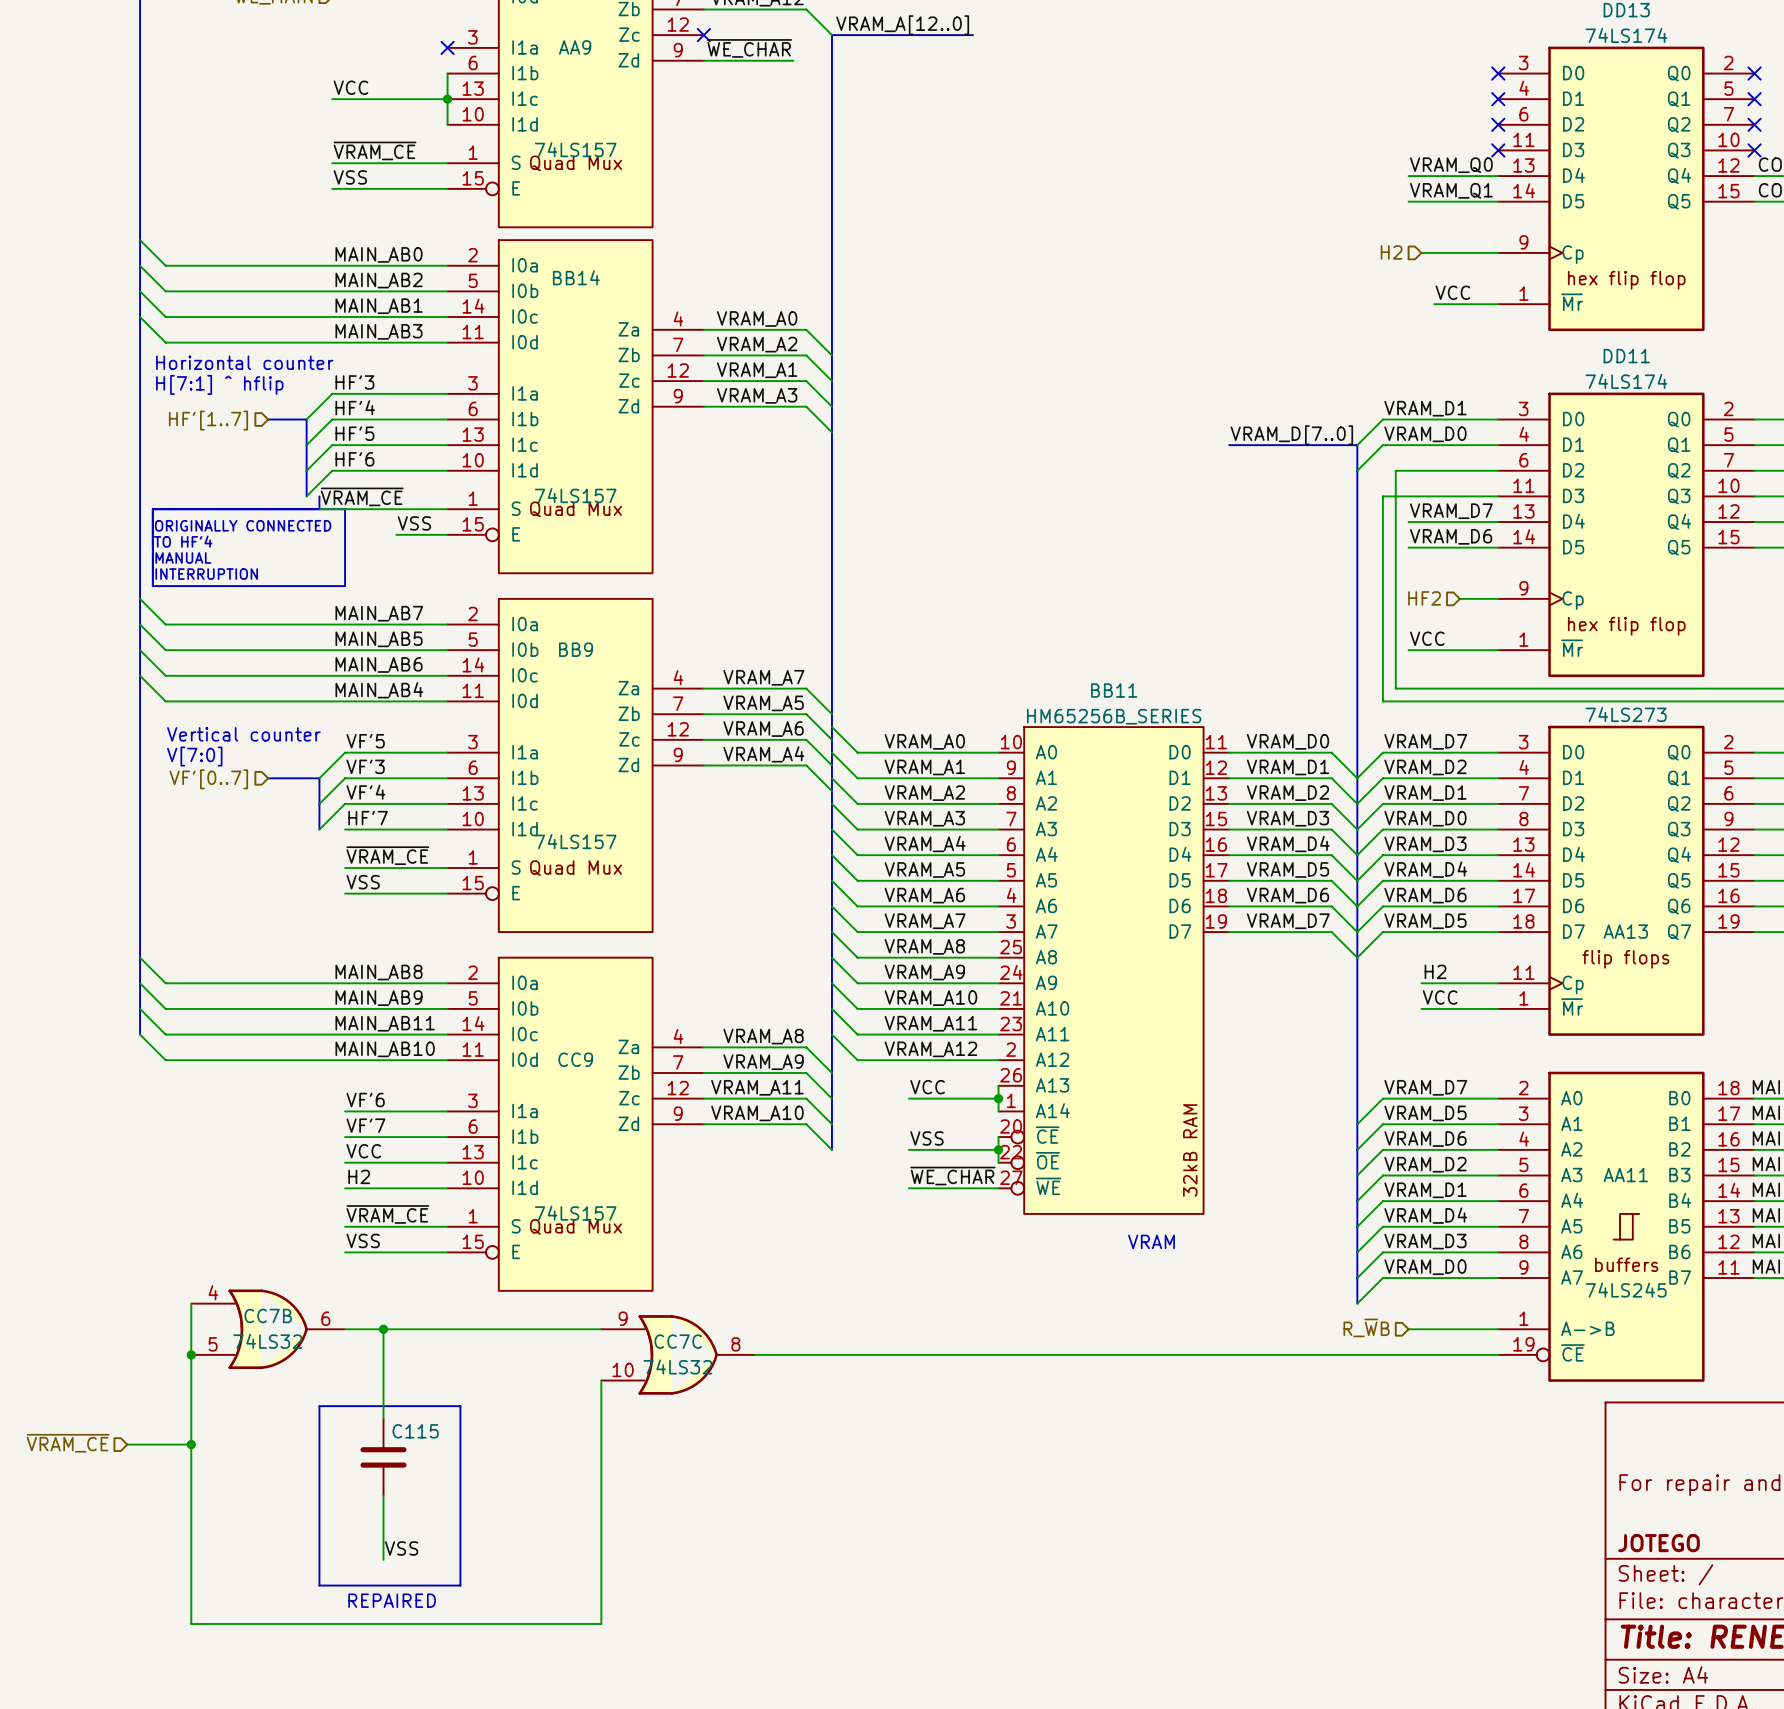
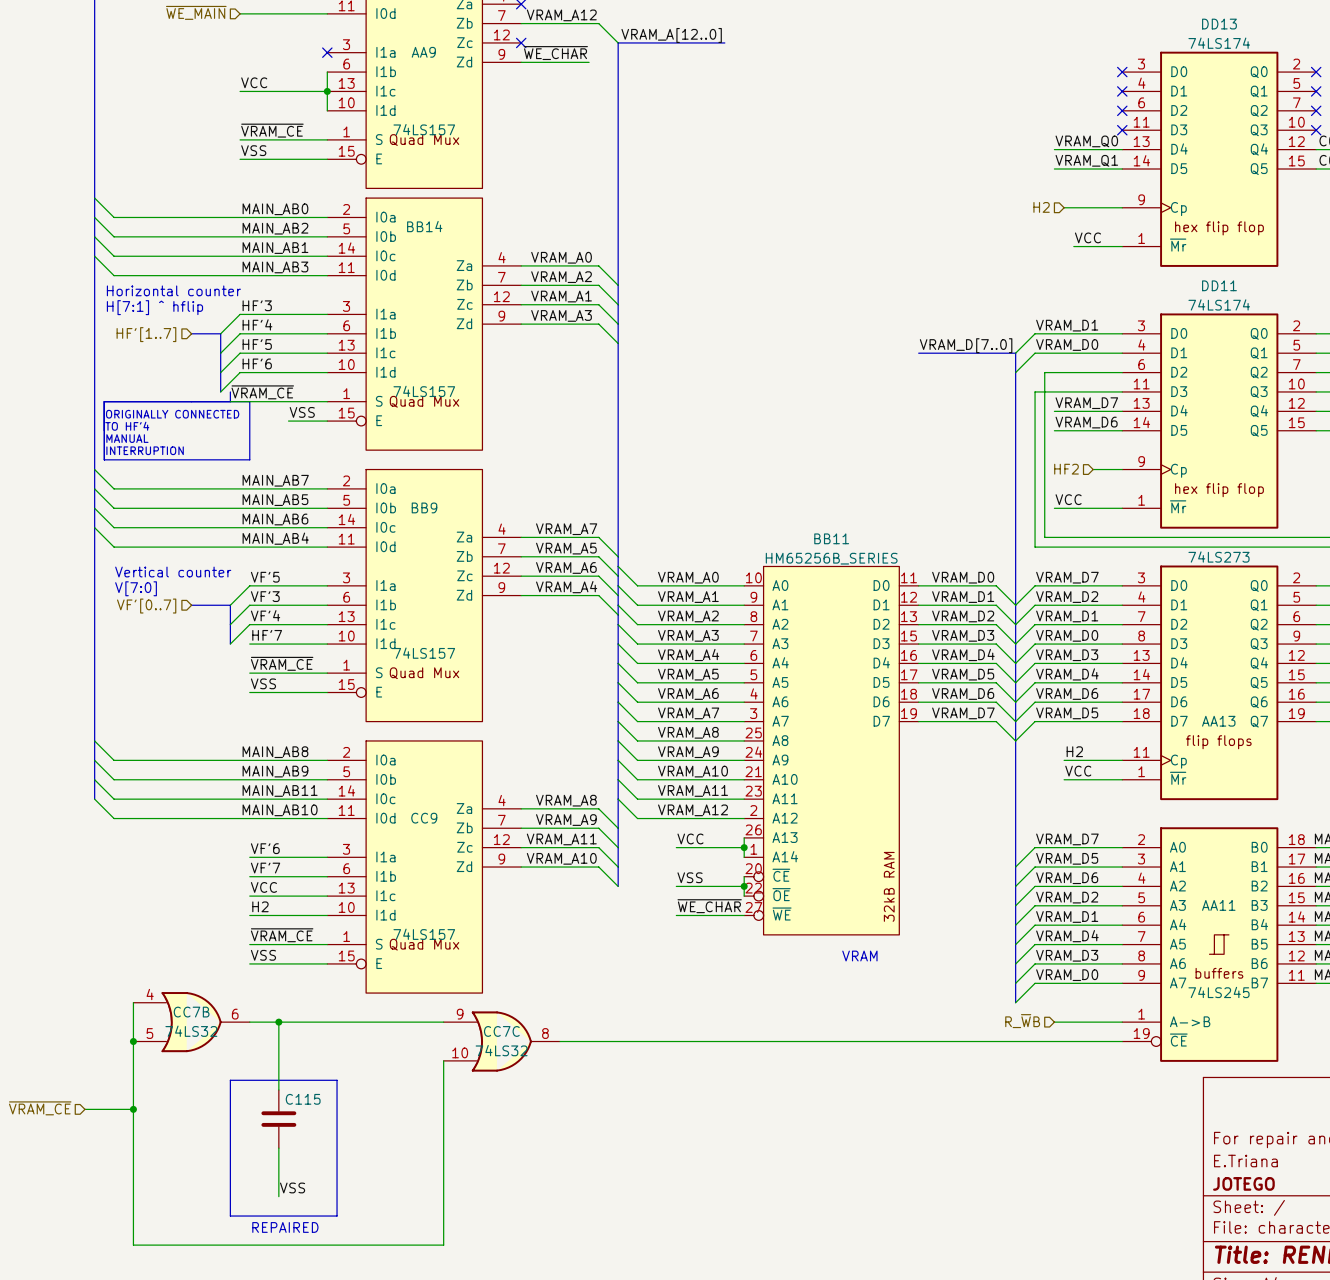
title block: none -> E.Triana (1245, 1161)

